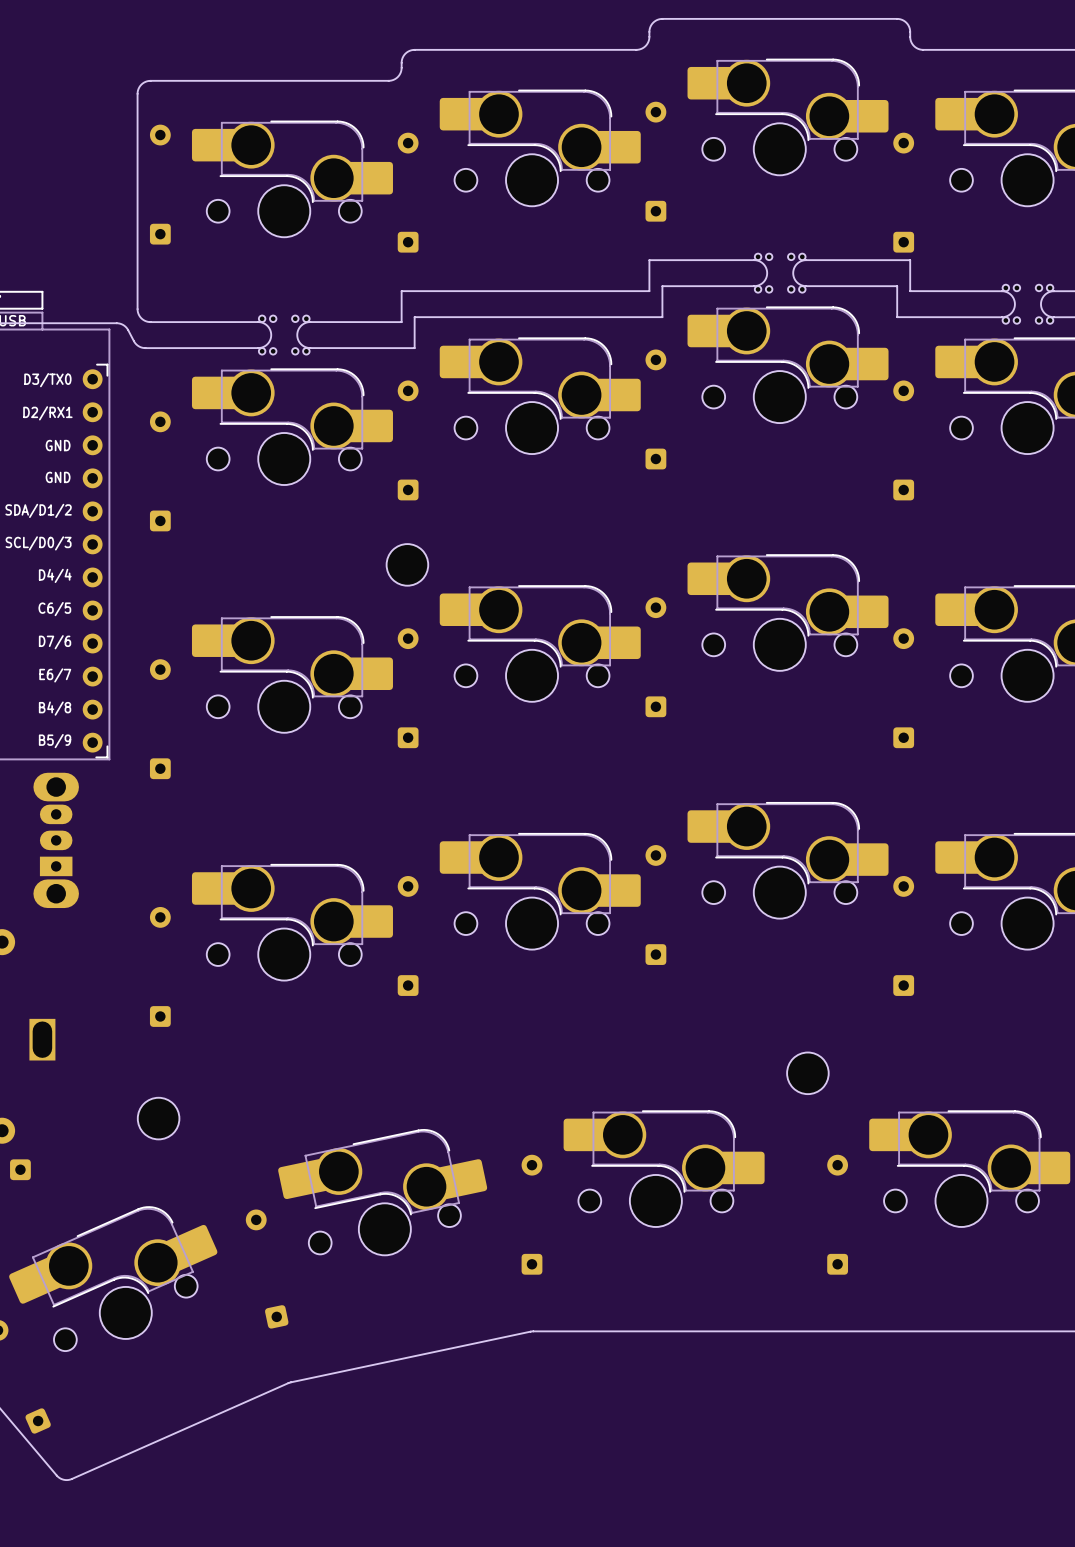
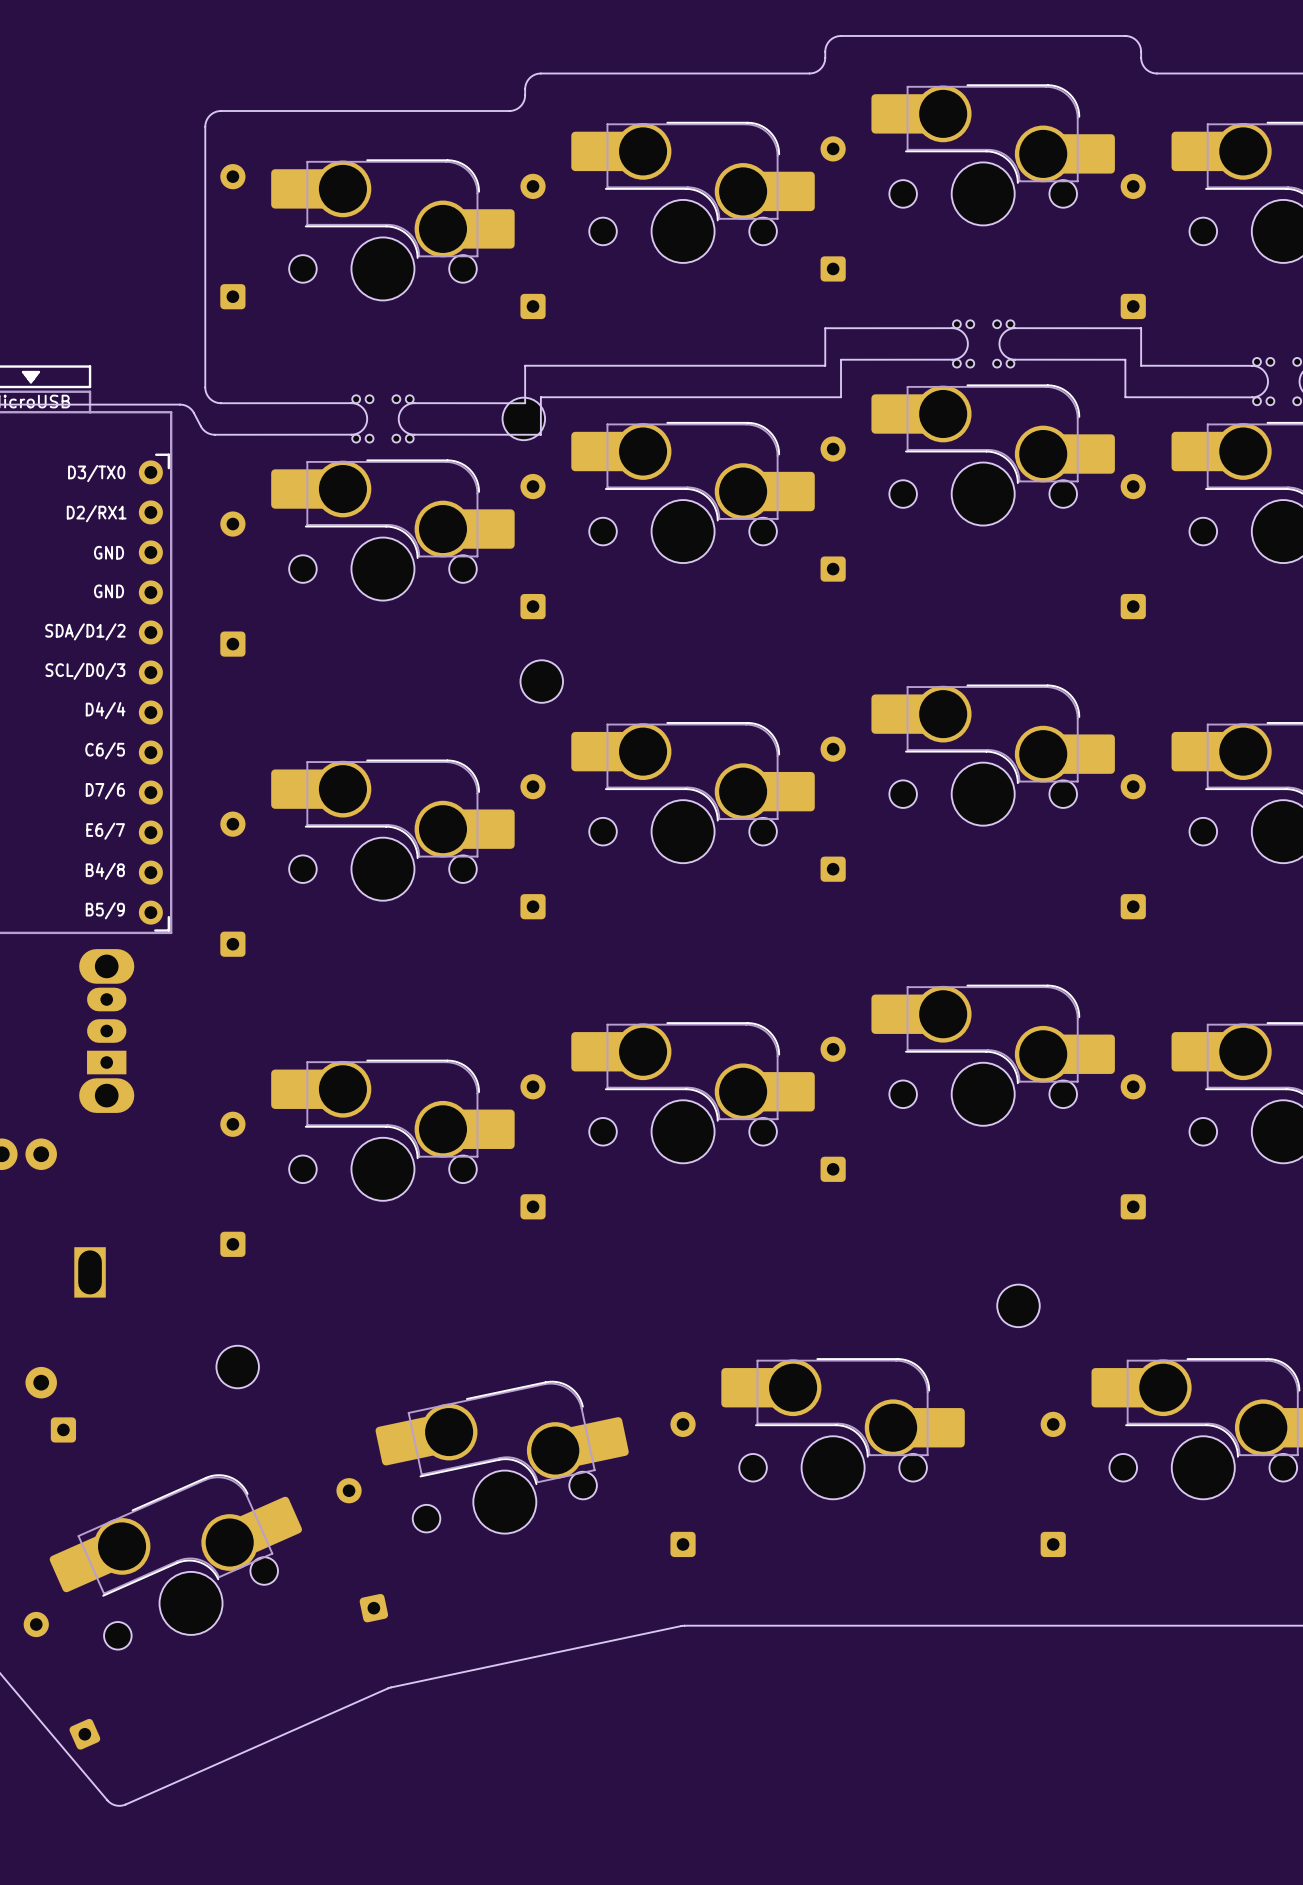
part: none -> (523, 418)
part: none -> (541, 681)
part: (407, 564) -> none
part footprint: [787, 1052, 829, 1095] -> [997, 1284, 1040, 1328]
part footprint: [137, 1097, 180, 1140] -> [216, 1345, 259, 1389]

